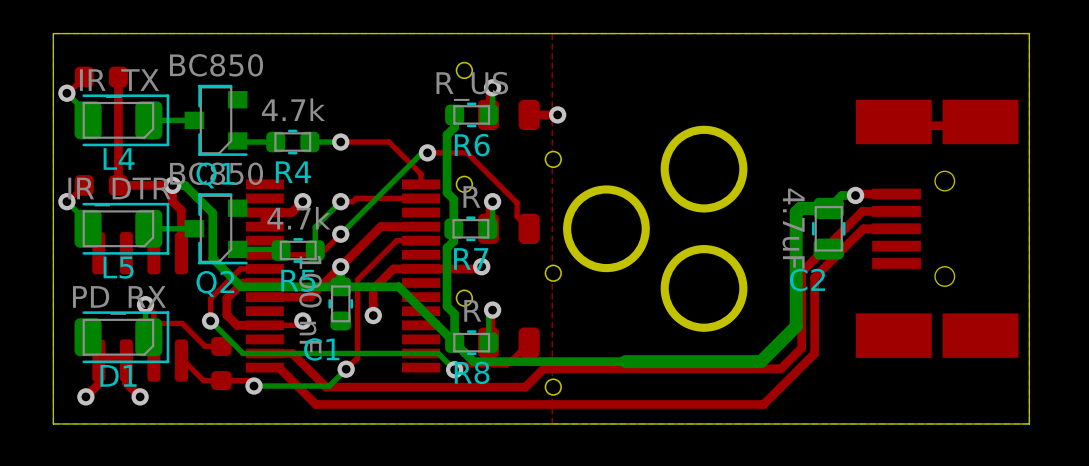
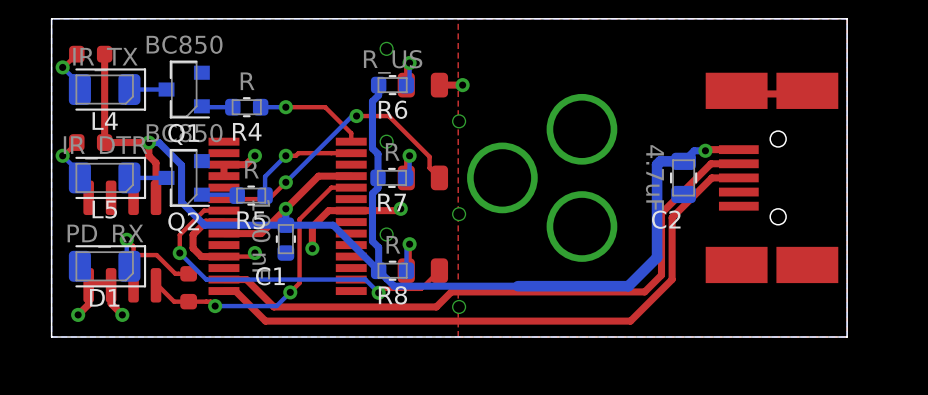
R4 value: 4.7k (293, 109) -> R (247, 81)
R5 value: 4.7k (298, 218) -> R (252, 169)

